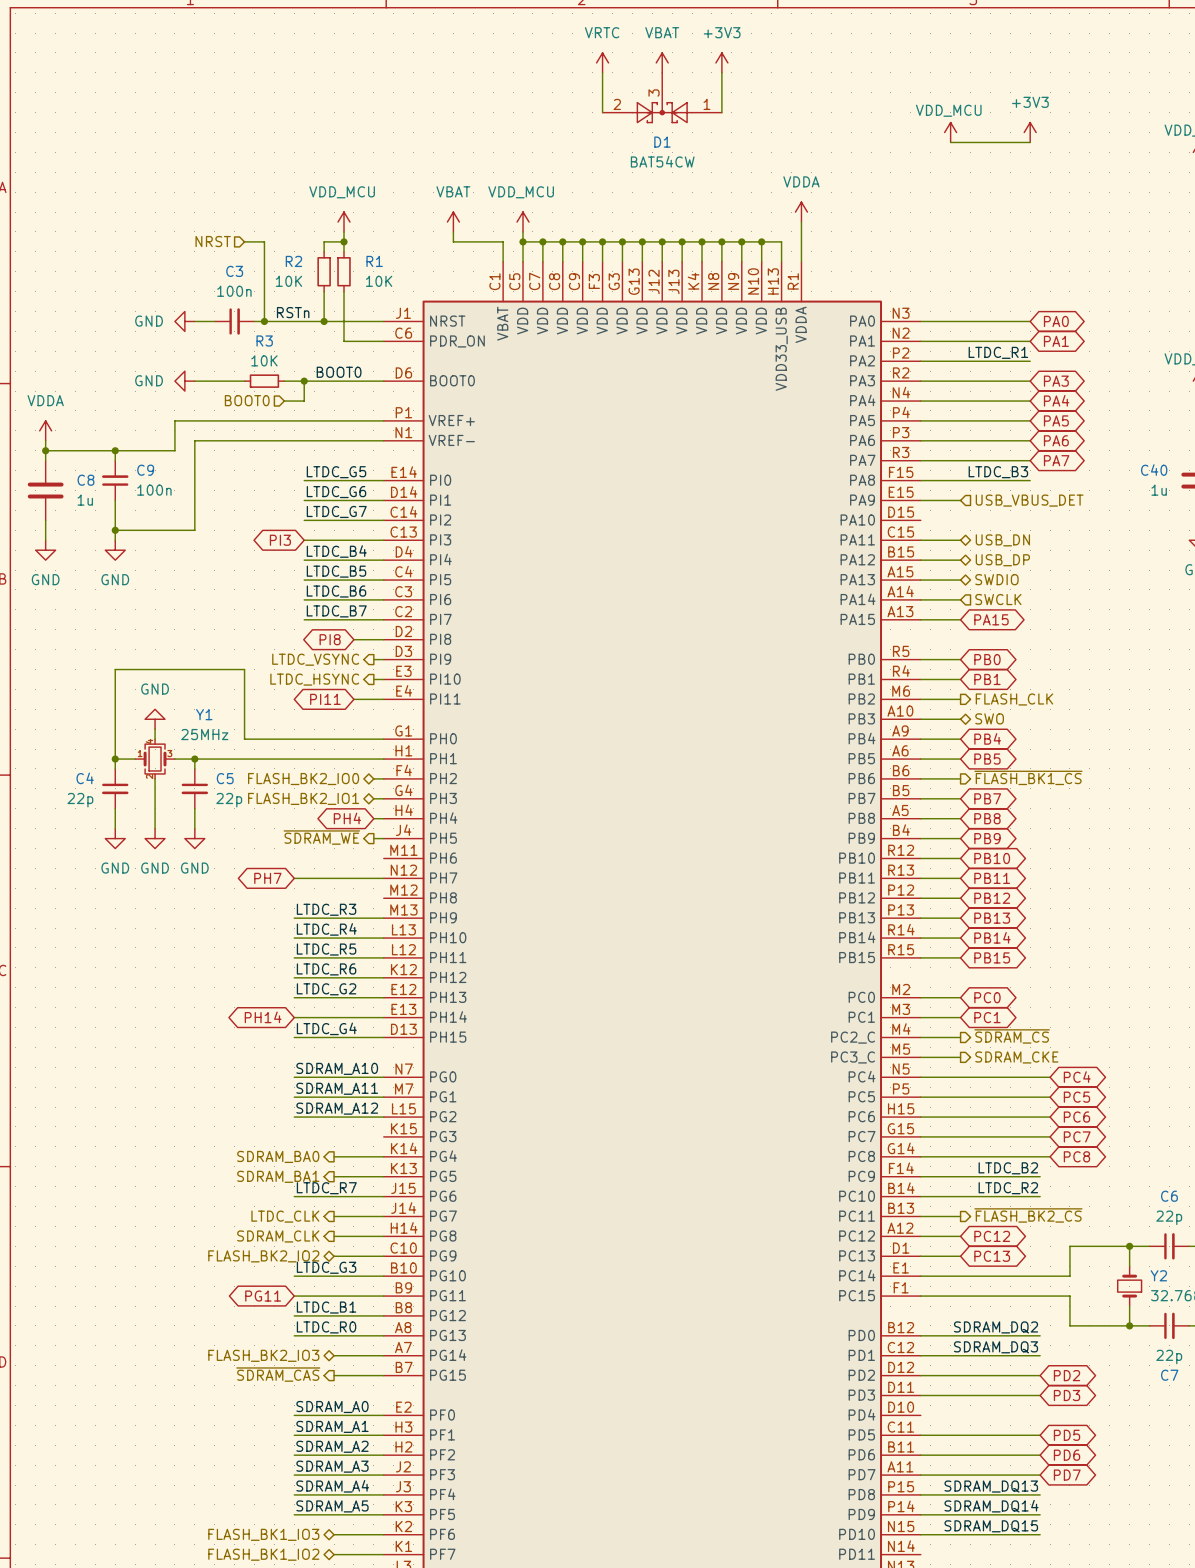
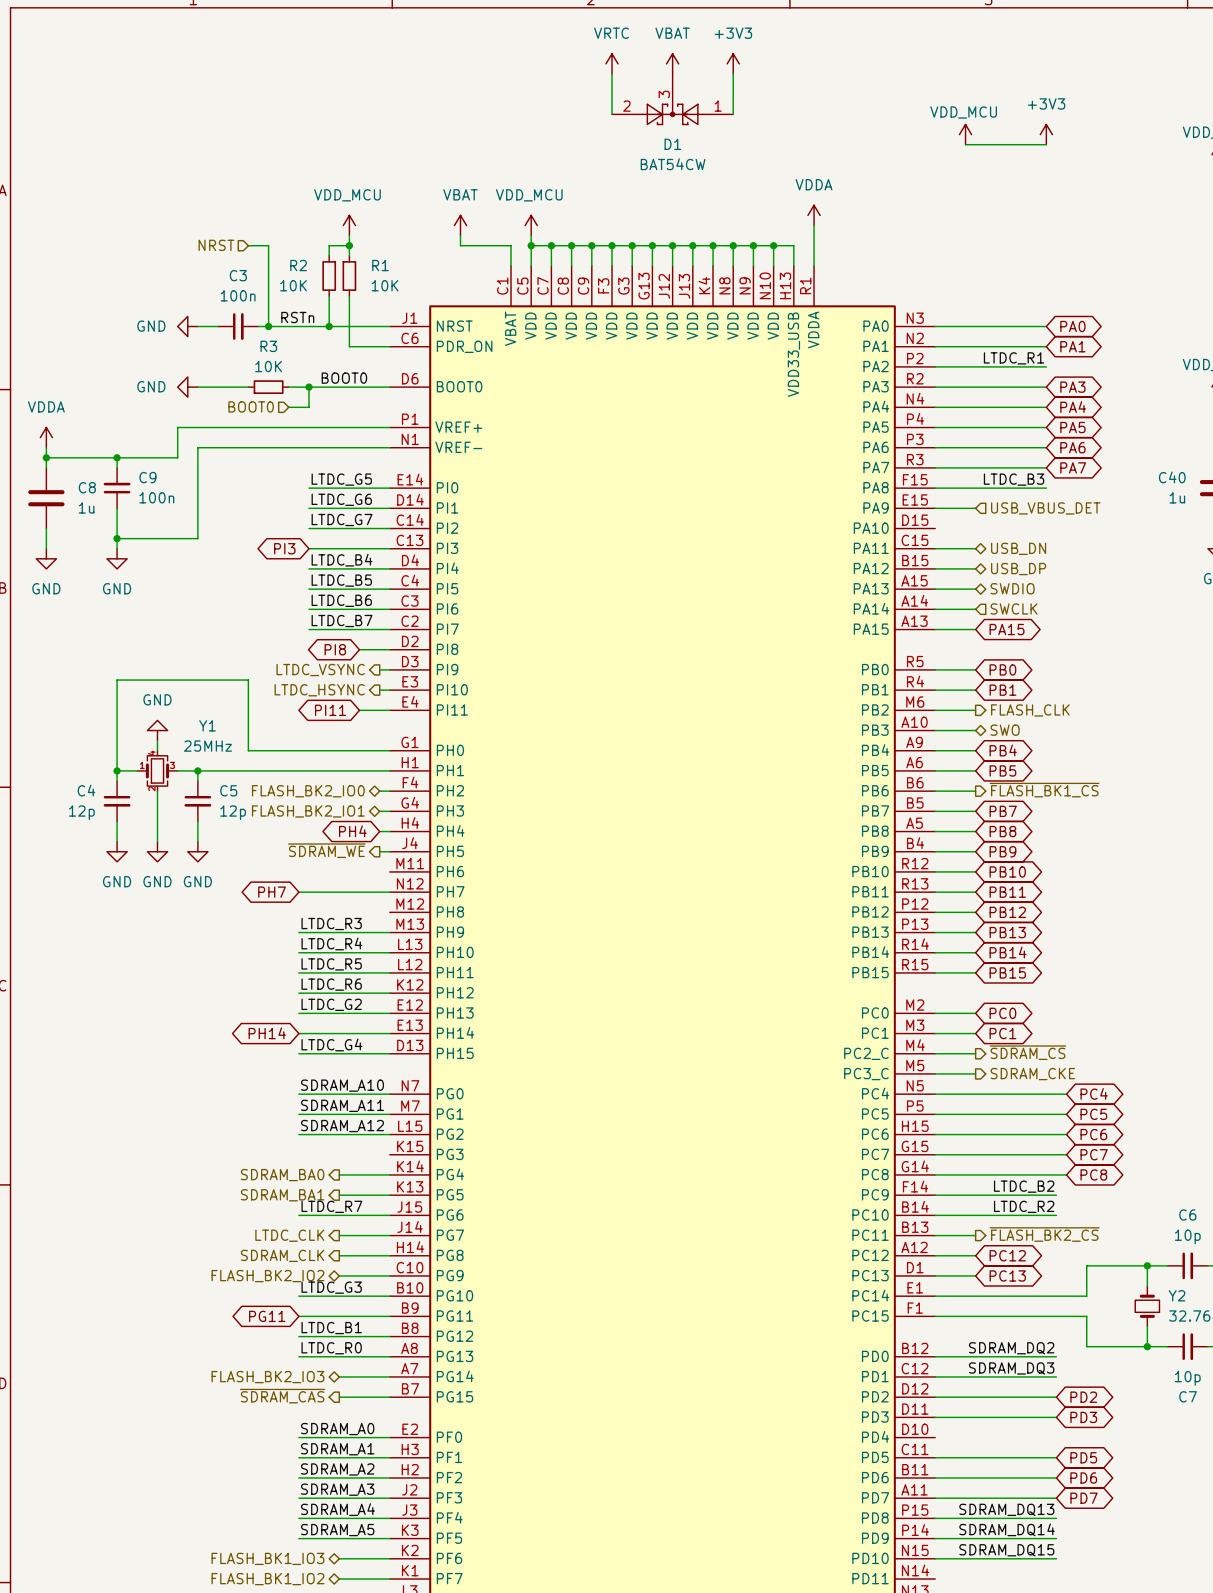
C4 value: 22p (80, 800) -> 12p (81, 812)
C5 value: 22p (229, 800) -> 12p (233, 812)
C6 value: 22p (1169, 1217) -> 10p (1187, 1236)
C7 value: 22p (1169, 1357) -> 10p (1187, 1378)

